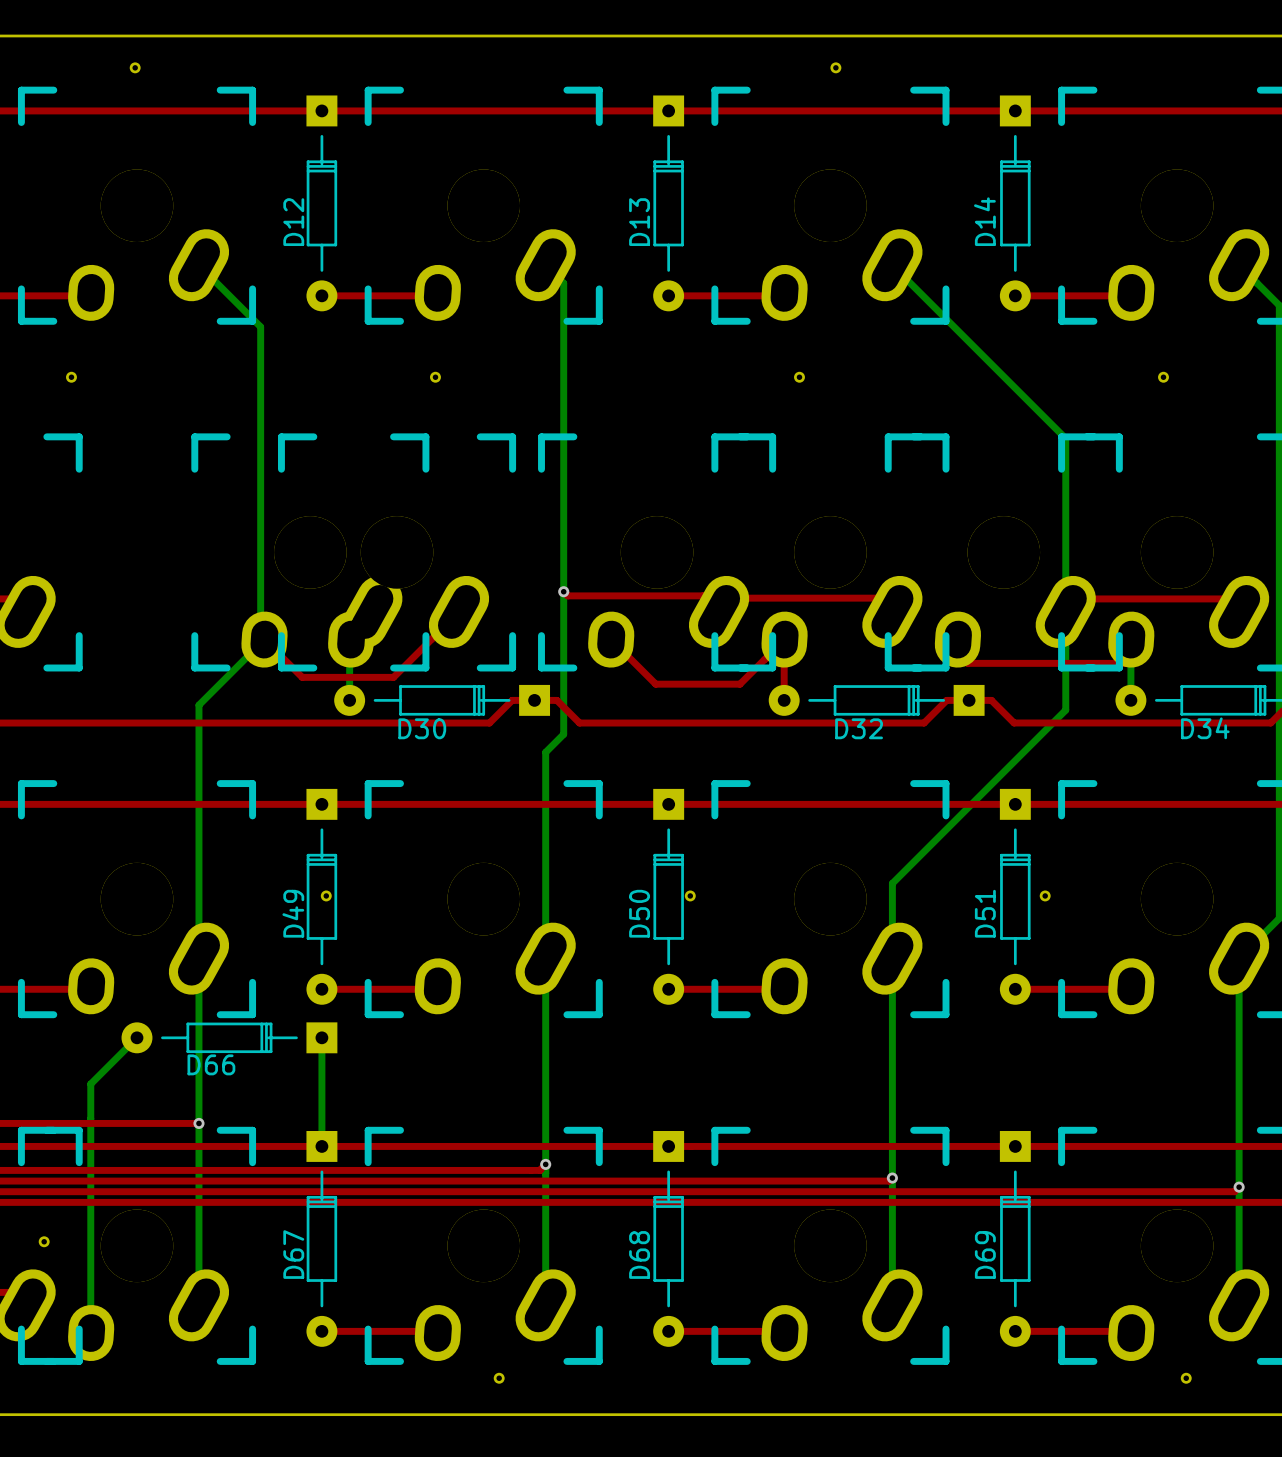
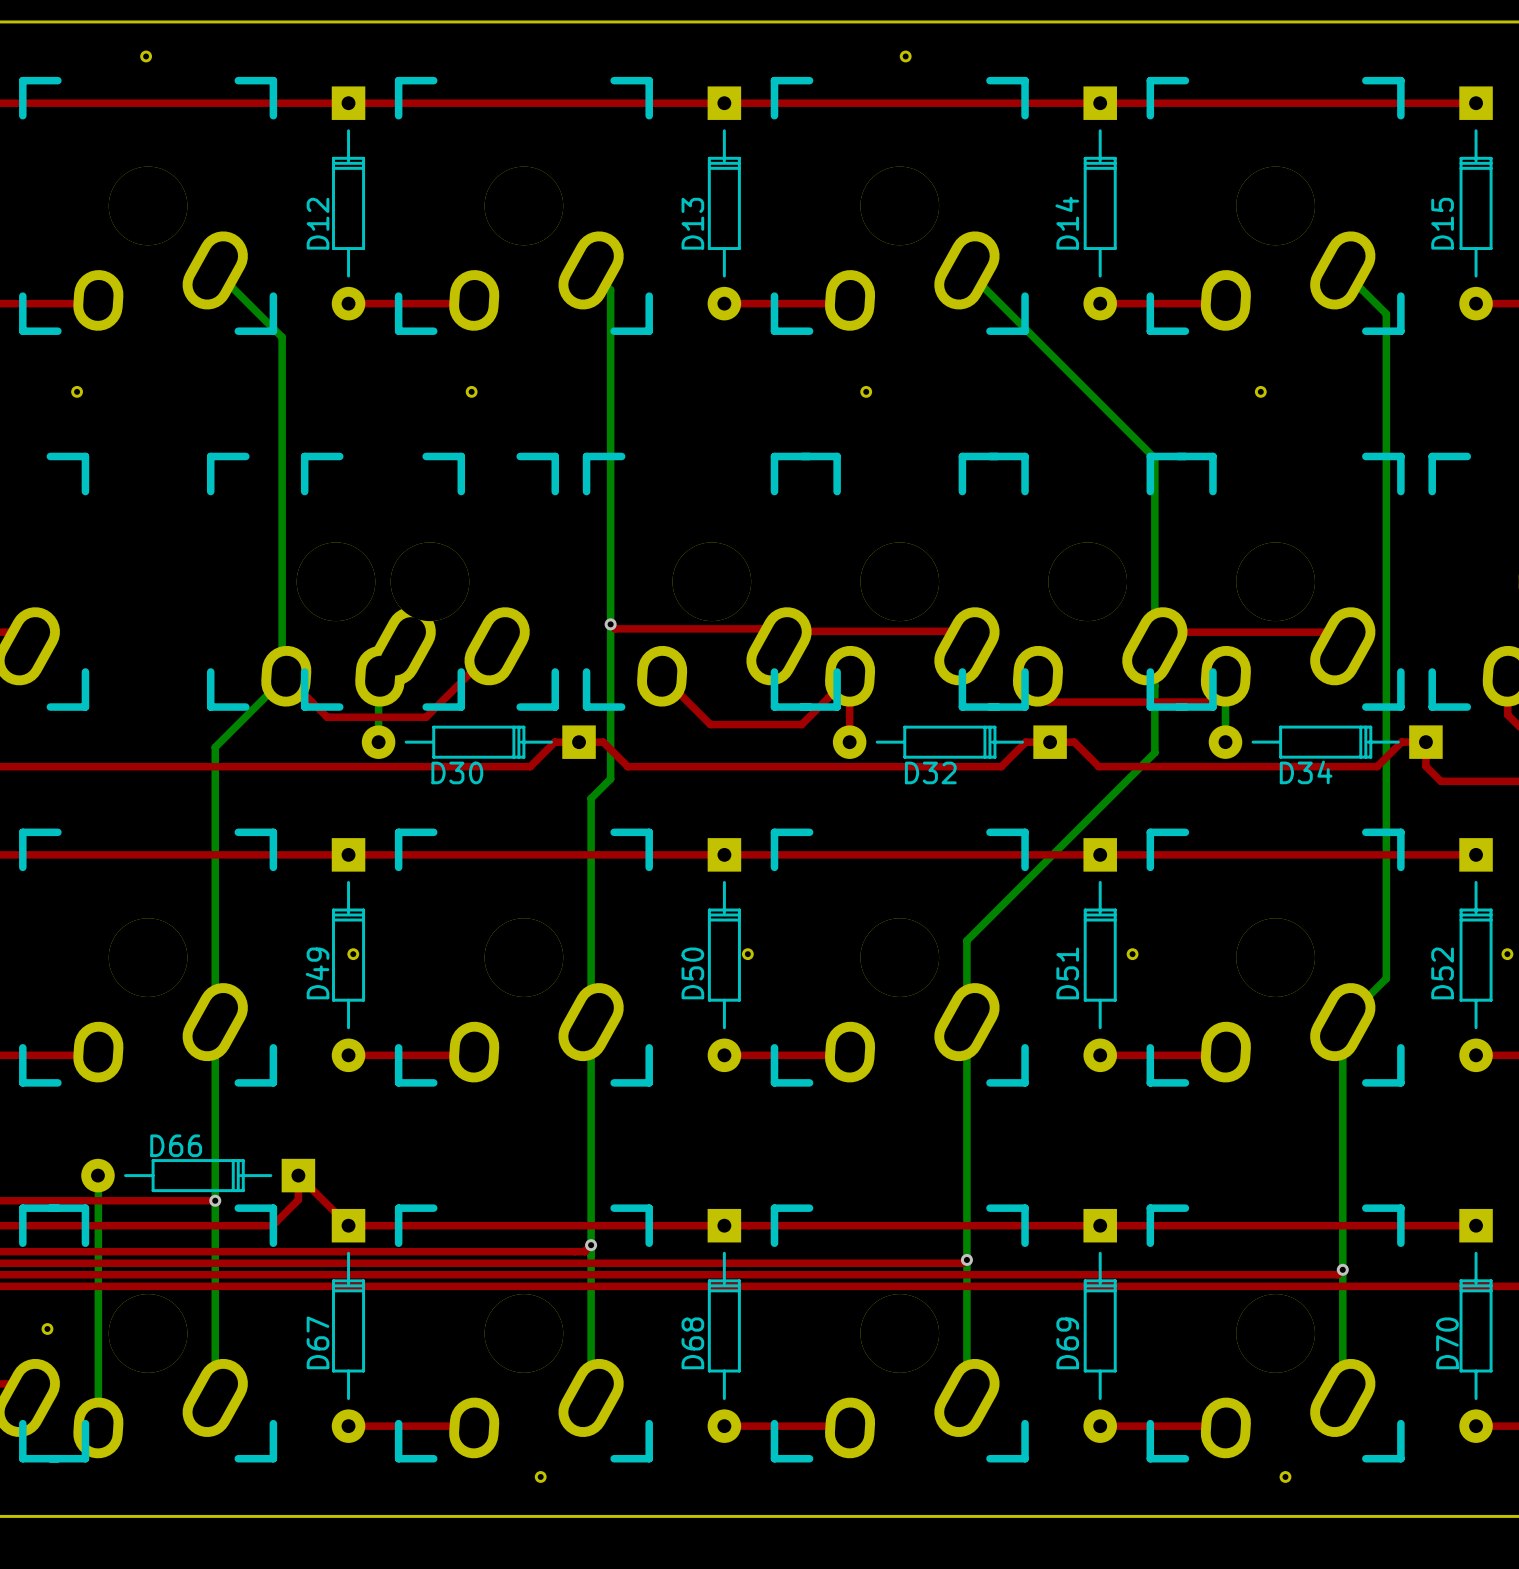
bottom track: (137, 1037) (90, 1084) (91, 1333) -> (97, 1175) (98, 1427)
D66 position: (229, 1037) -> (198, 1175)
bottom track: (321, 1037) (321, 1146) -> none
D66 name position: D66 (211, 1064) -> D66 (176, 1145)
top track: (251, 1146) (321, 1146) -> (272, 1225) (298, 1199) (298, 1175) (348, 1225)

